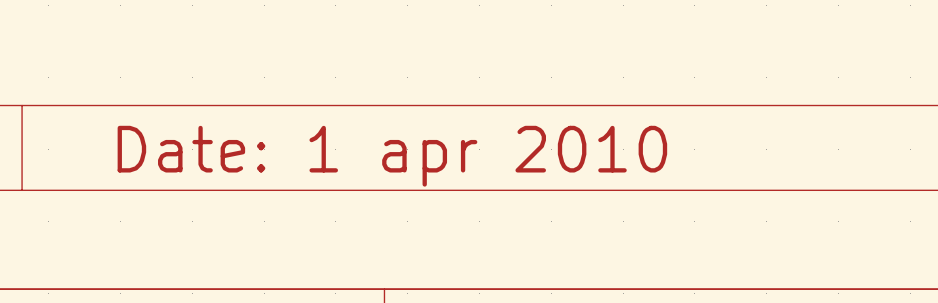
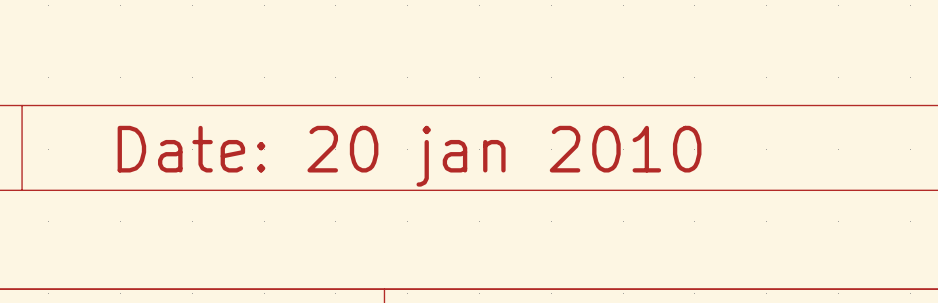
title block: Date: 1 apr 2010 (392, 156) -> Date: 20 jan 2010 (409, 156)

